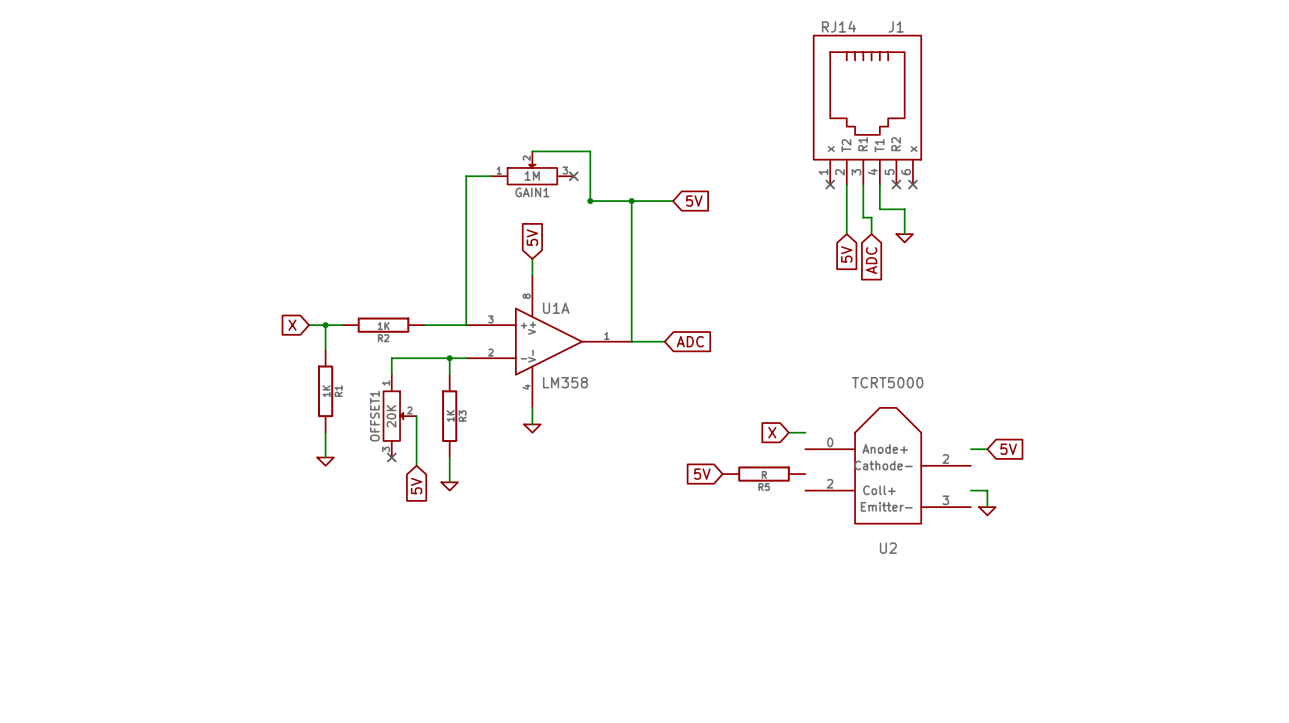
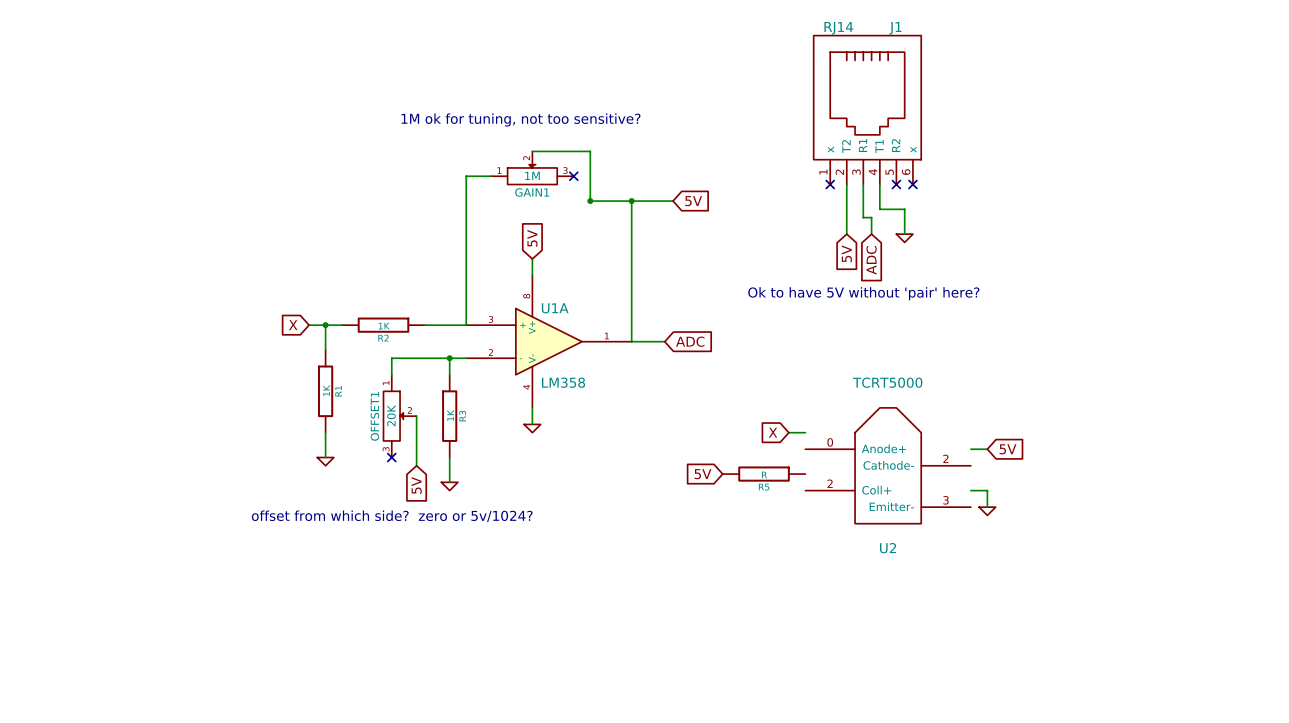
text: none -> 1M ok for tuning, not too sensitive? (521, 120)
text: none -> Ok to have 5V without 'pair' here? (863, 293)
text: none -> offset from which side? zero or 5v/1024? (392, 516)

